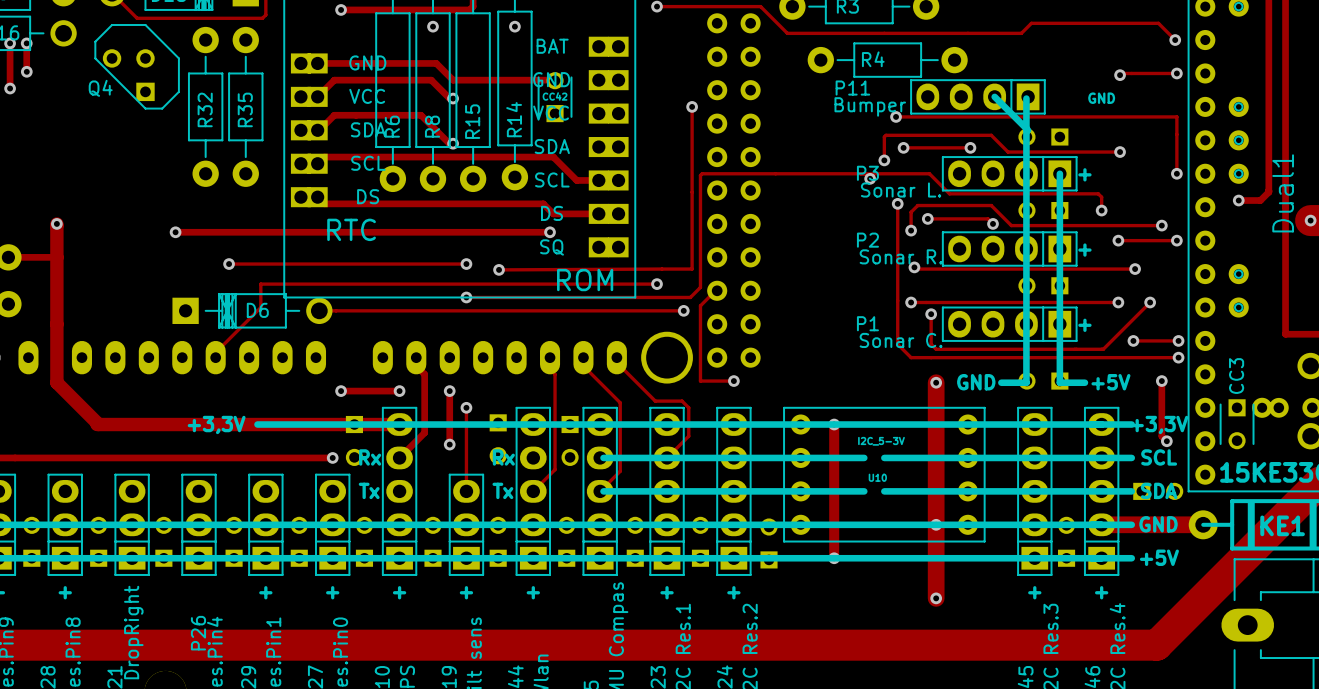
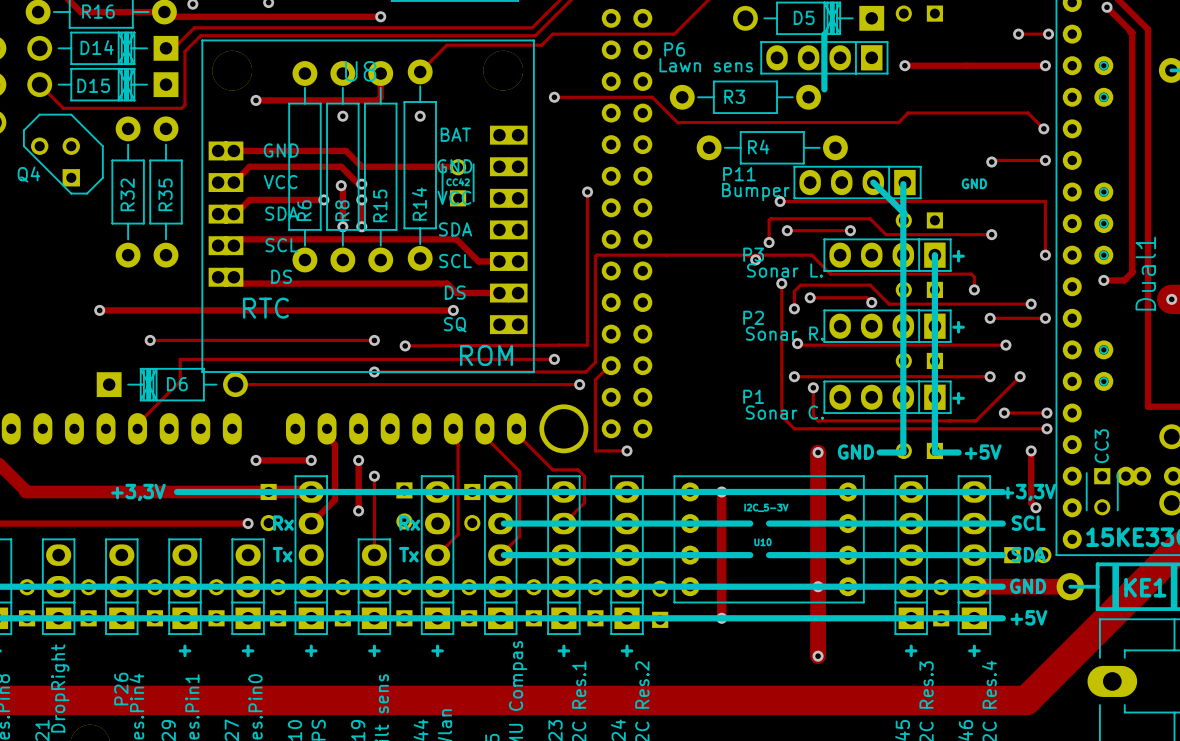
track: none -> (341, 185) (342, 187) (342, 226)
via: none -> (341, 185)
track: (412, 115) (421, 115) (449, 143) (453, 143) -> (361, 199) (361, 226)
via: none -> (323, 199)
via: none -> (361, 199)
via: none -> (342, 226)

